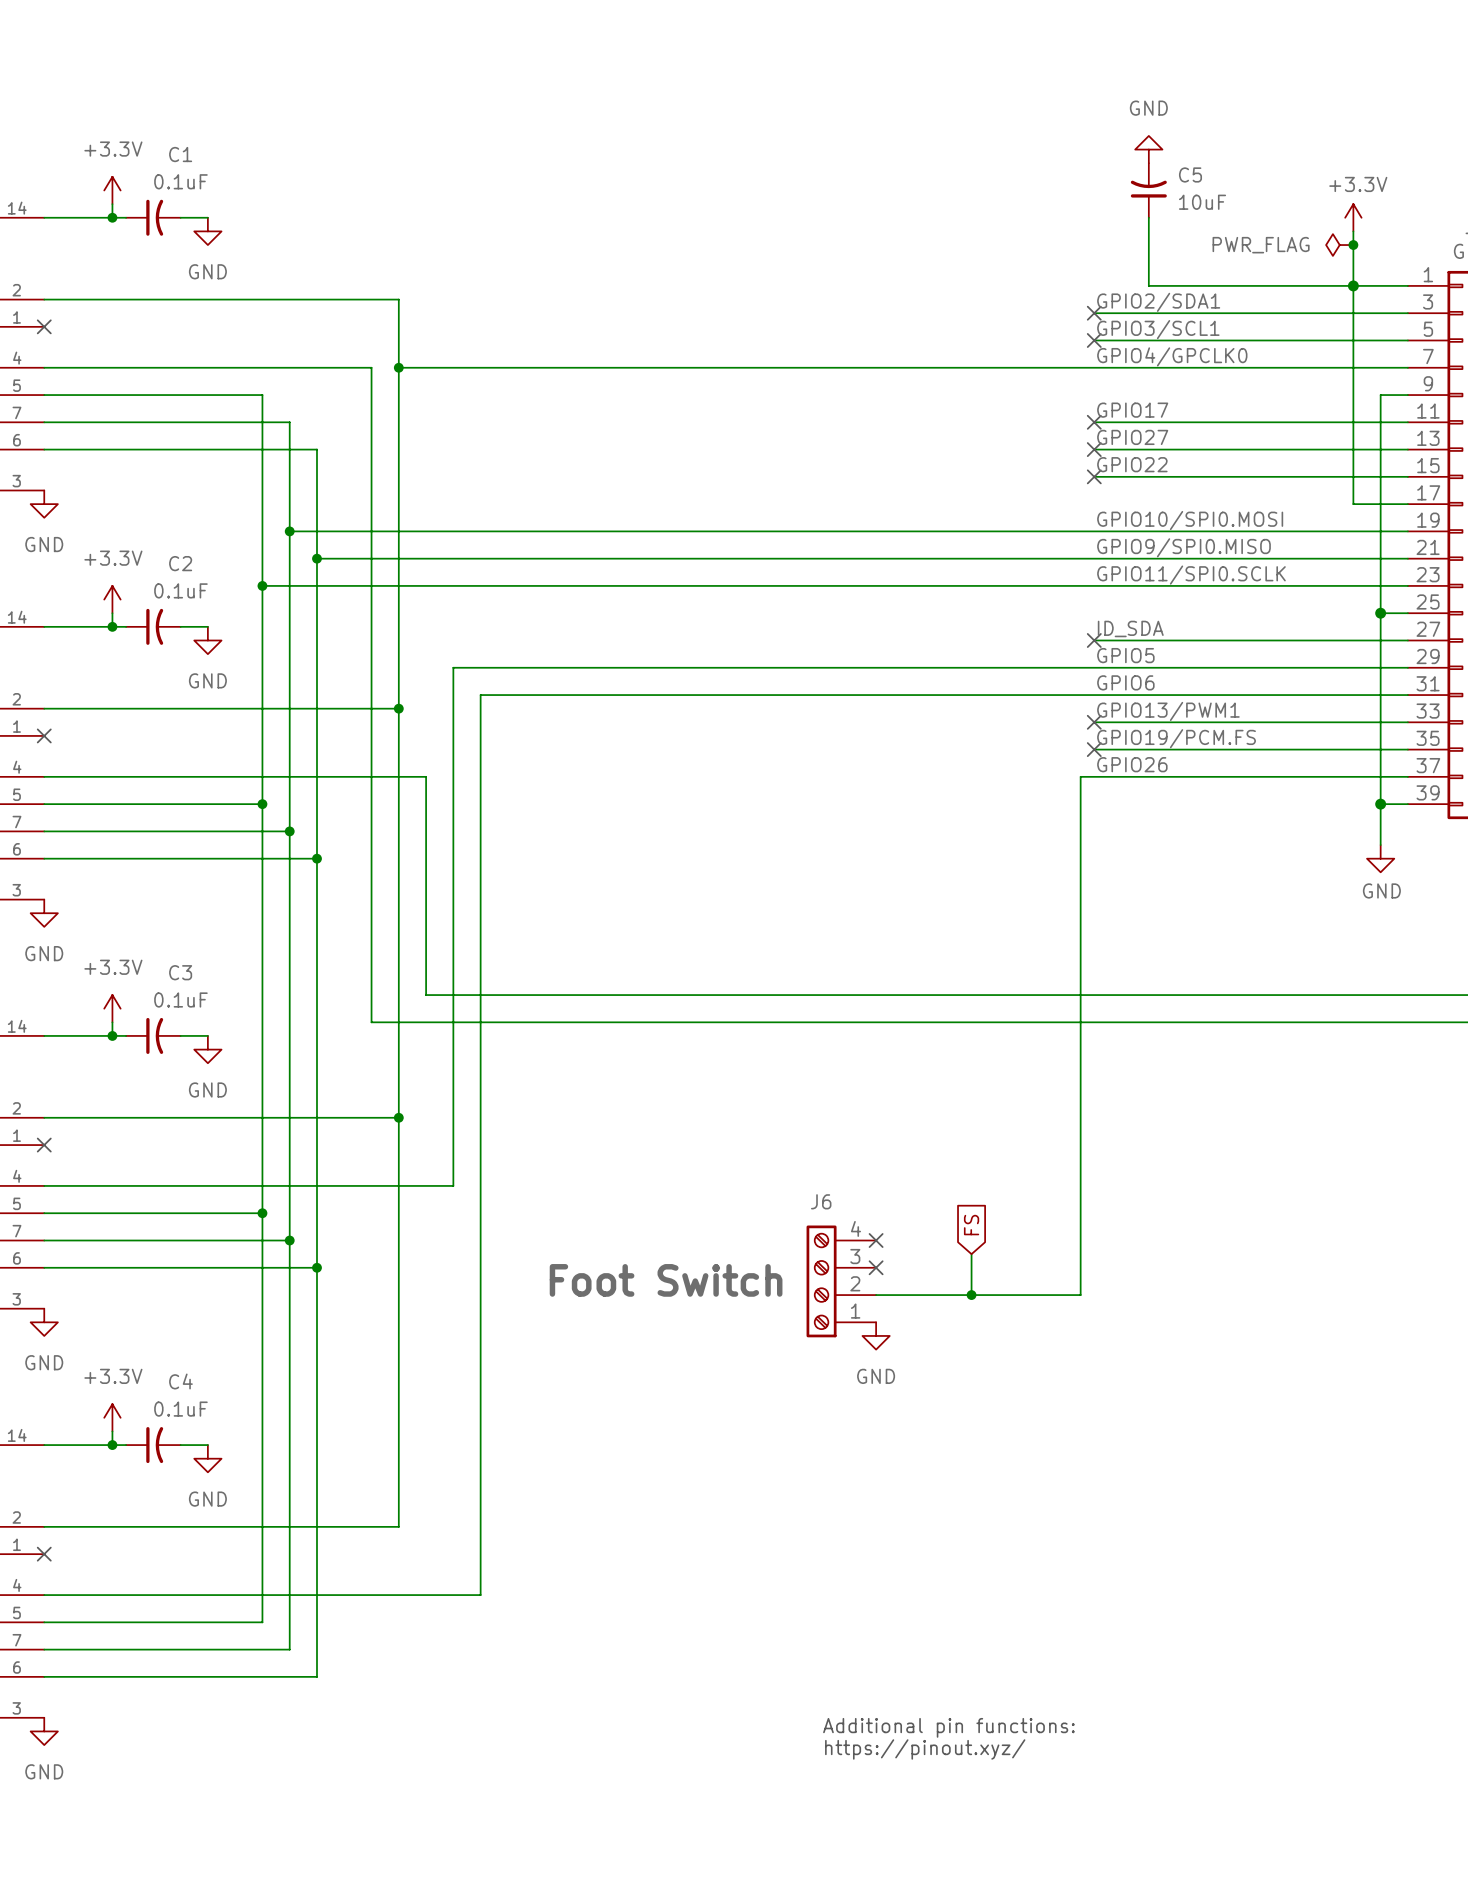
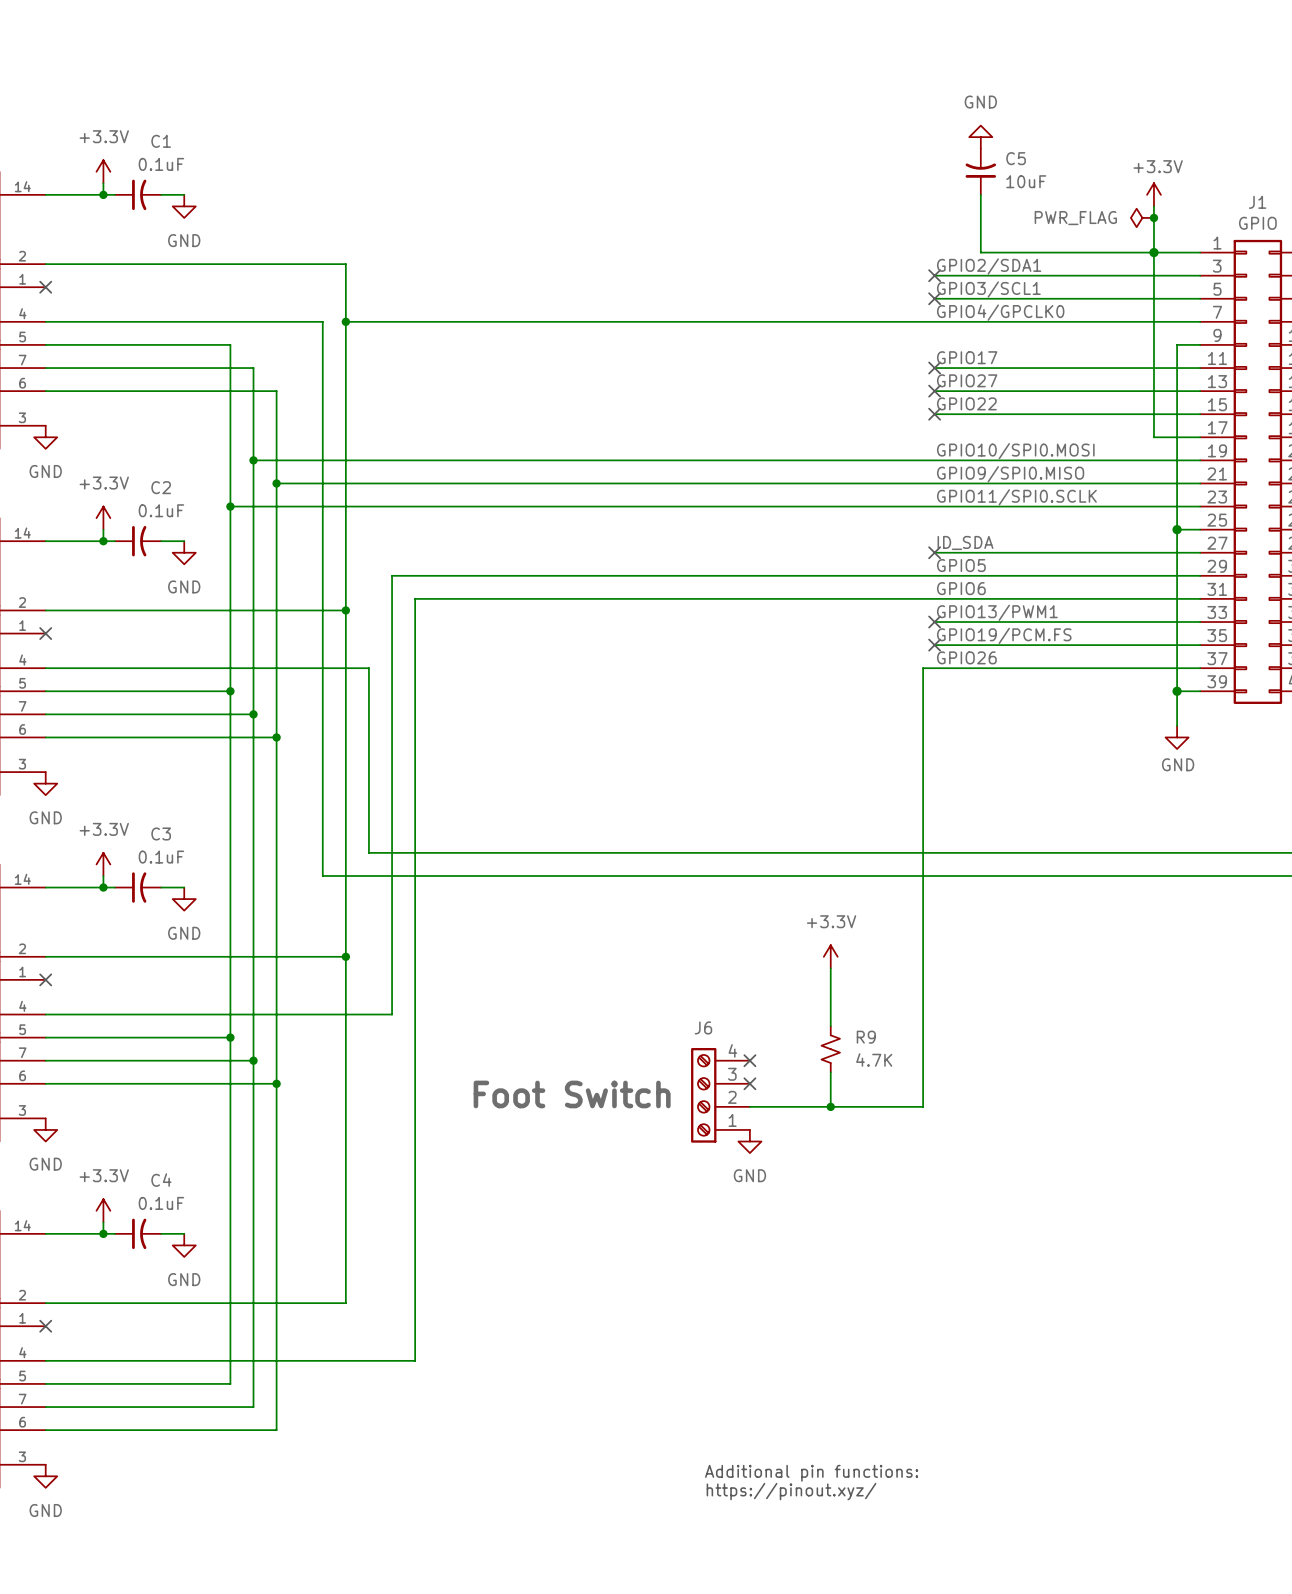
power symbol: none -> +3.3V (830, 956)
wire: none -> (830, 968) (830, 1026)
global label: FS (971, 1225) -> none
R9: none -> 4.7K (830, 1049)

